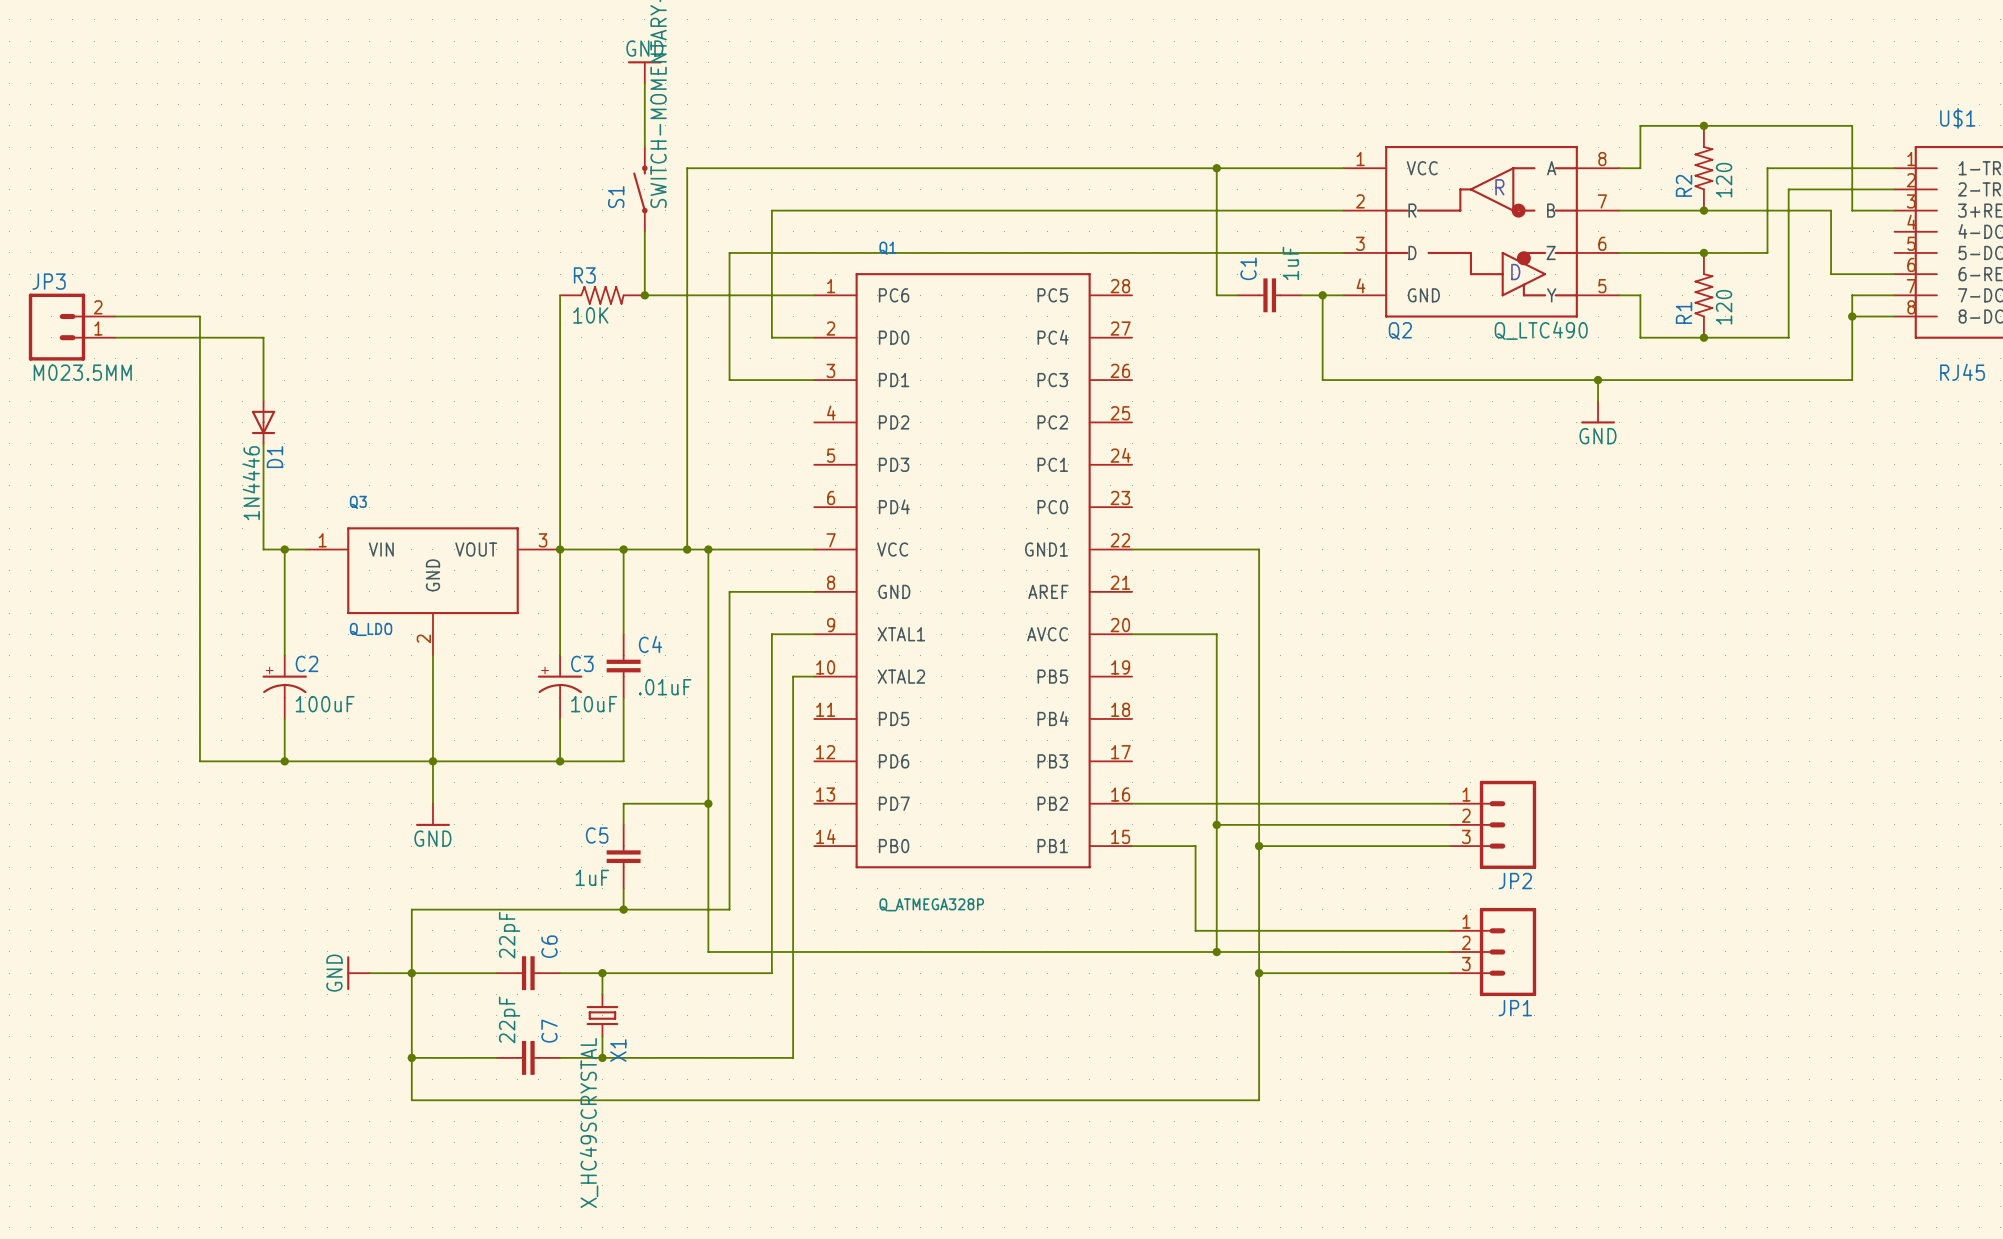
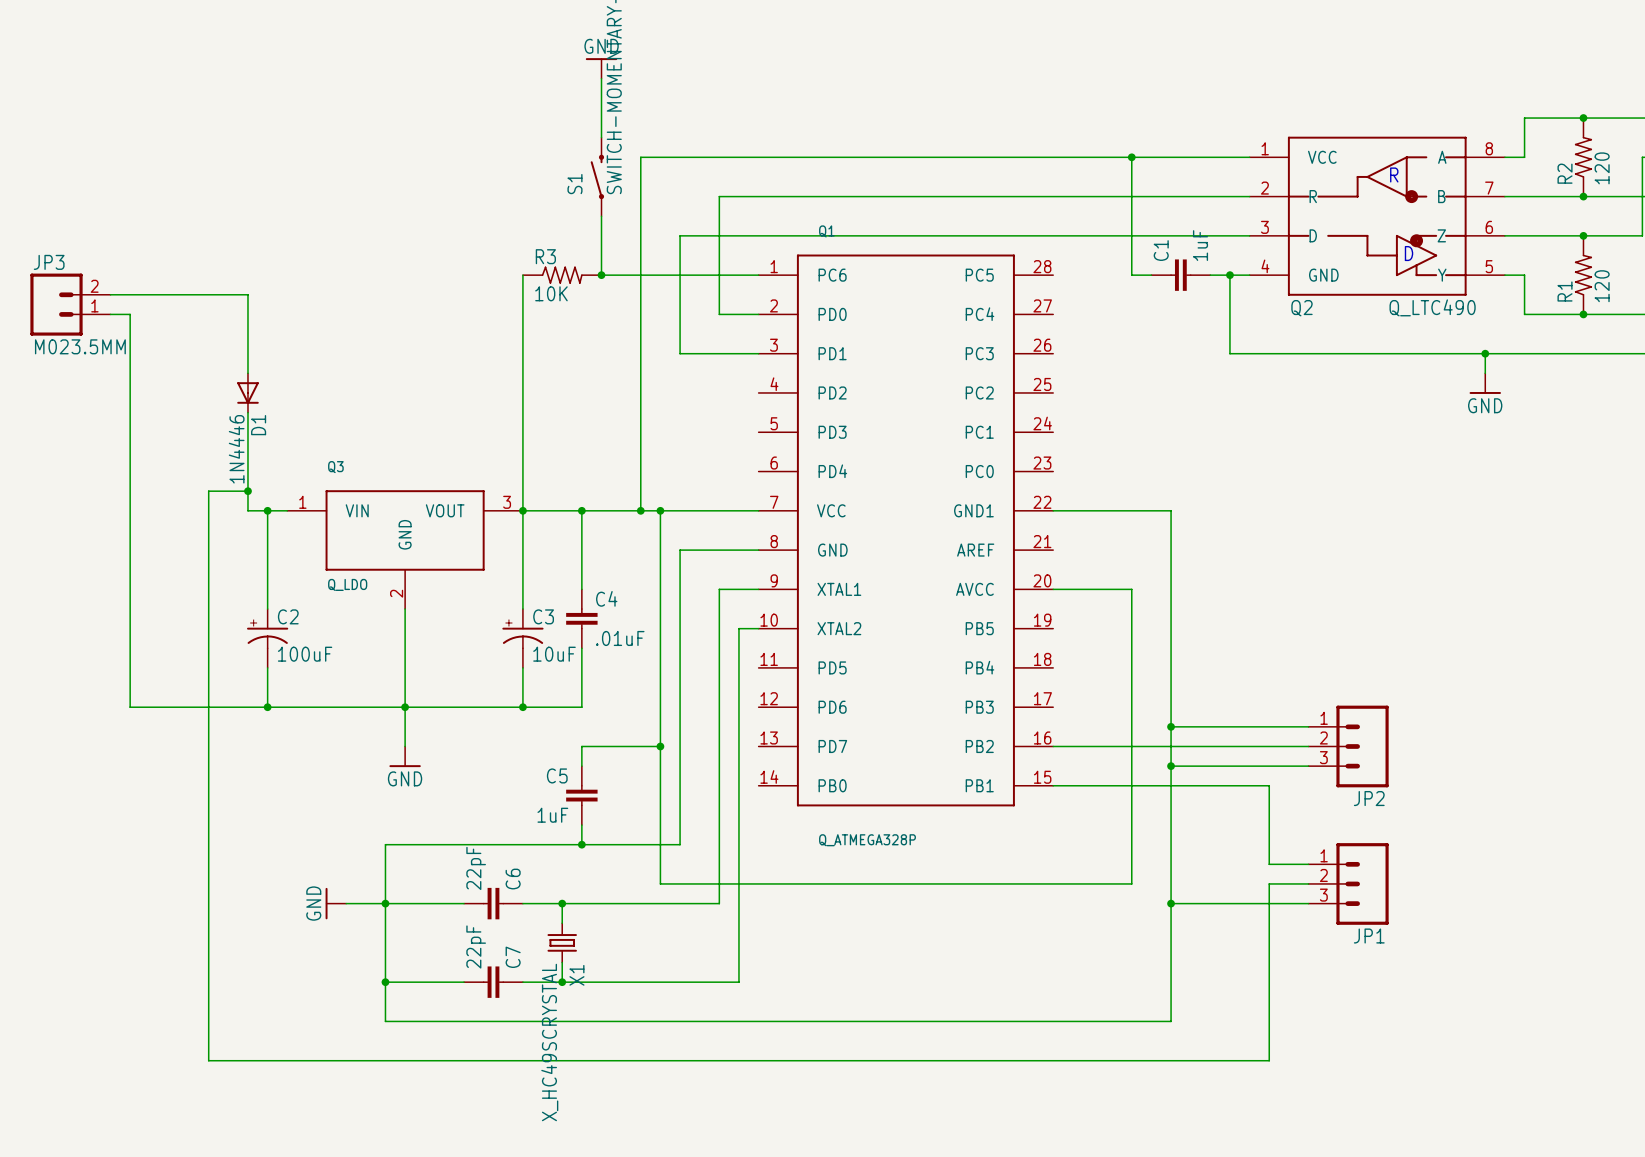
wire: (199, 316) (199, 761) -> (130, 314) (130, 707) (189, 707)
wire: (136, 337) (263, 337) -> (189, 294) (247, 294) (247, 314)
junction: none -> (247, 491)
wire: none -> (1171, 726) (1308, 726)
junction: none -> (1171, 726)
wire: (1216, 824) (1259, 824) -> none
junction: (1216, 824) -> none
junction: none -> (1171, 766)
JP2 position: (1492, 824) -> (1348, 746)
wire: (1195, 846) (1195, 930) (1365, 930) -> (1112, 785) (1171, 785)
junction: (1259, 846) -> none
wire: (1365, 846) (1449, 846) -> (1269, 785) (1269, 864)
wire: (1216, 951) (1365, 951) -> (247, 491) (208, 491) (208, 1060) (1269, 1060) (1269, 883)
junction: (1216, 951) -> none
JP1 position: (1492, 951) -> (1348, 883)

